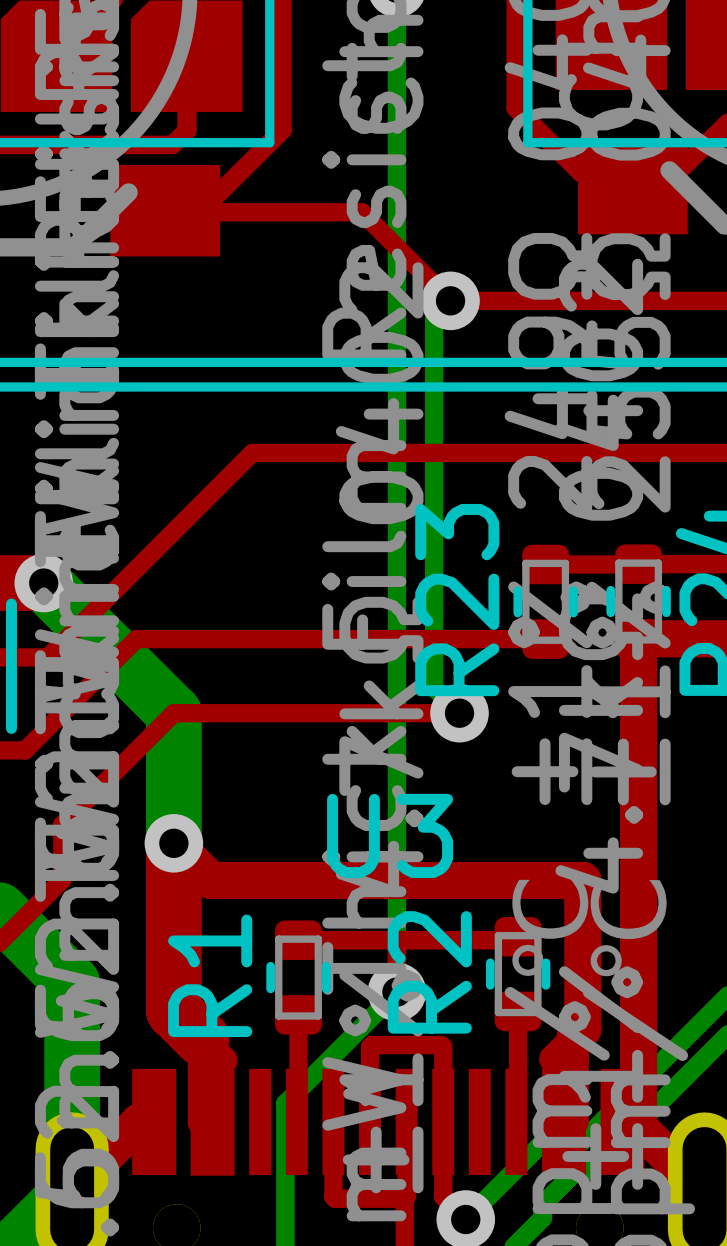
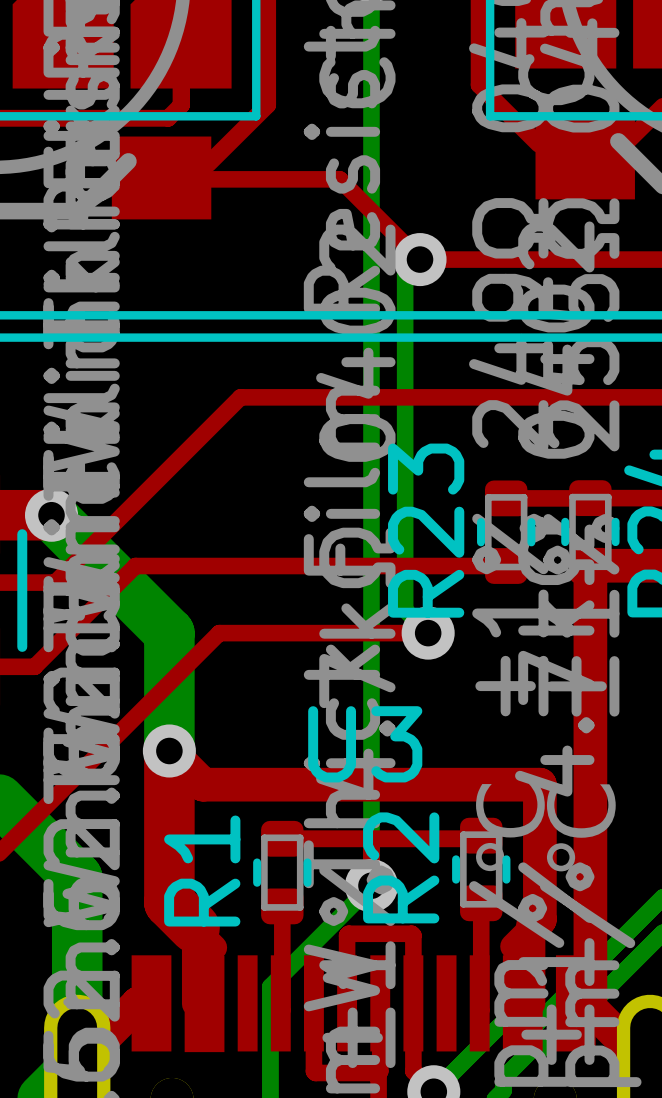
top track: (228, 713) (173, 713) (62, 824) (62, 879) -> (219, 633) (68, 784)

